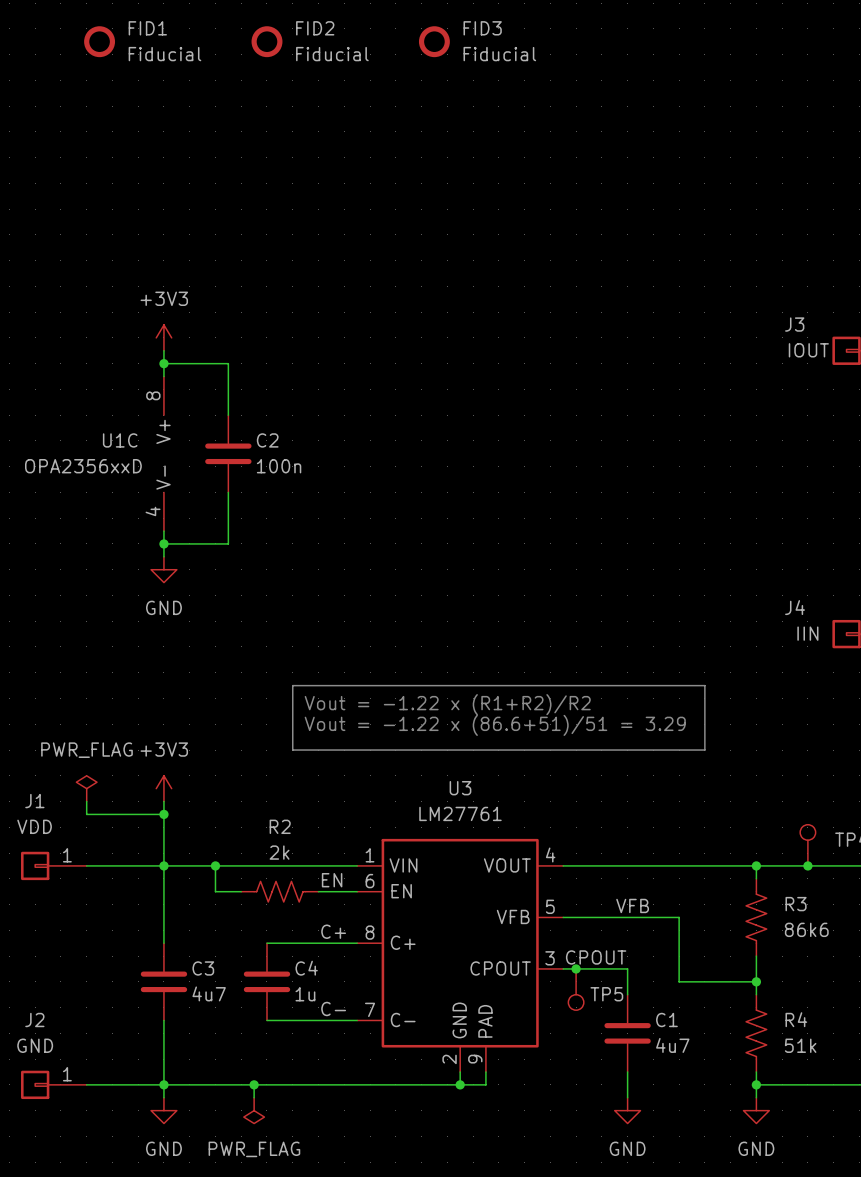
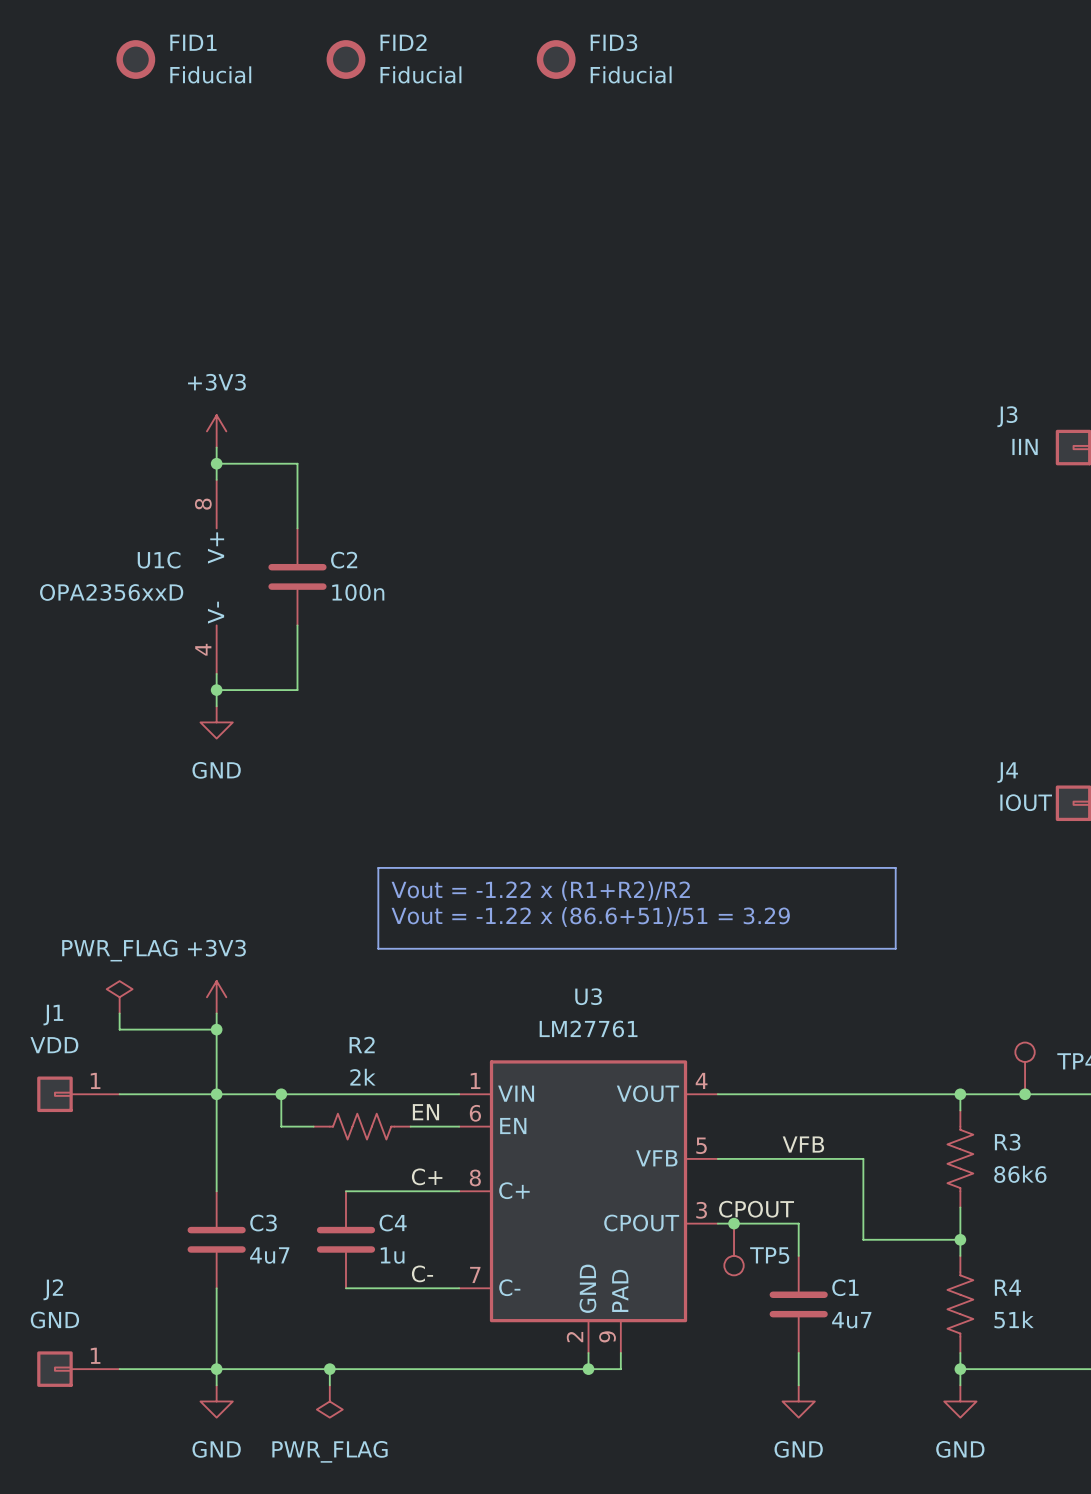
J3 value: IOUT (808, 350) -> IIN (1025, 446)
J4 value: IIN (807, 633) -> IOUT (1026, 802)

